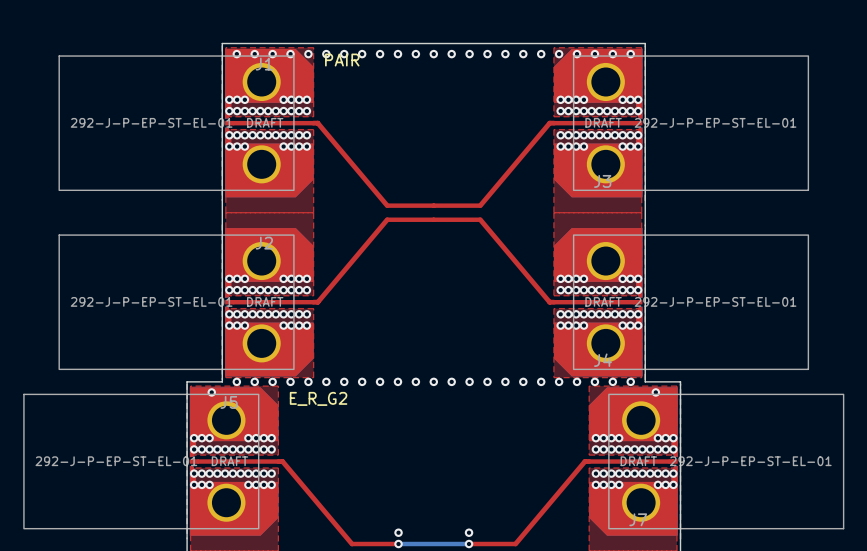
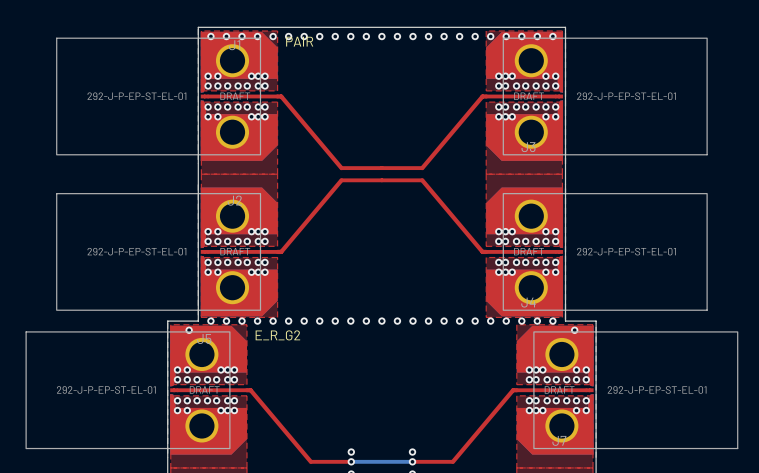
via: (229, 99) -> none
via: none -> (208, 76)
via: (237, 99) -> none
via: (306, 99) -> none
via: (560, 99) -> none
via: (630, 99) -> none
via: none -> (555, 76)
via: (638, 99) -> none
via: (229, 111) -> none
via: none -> (208, 86)
via: (237, 111) -> none
via: (252, 111) -> none
via: none -> (227, 86)
via: (260, 111) -> none
via: (275, 111) -> none
via: none -> (247, 86)
via: (283, 111) -> none
via: (306, 111) -> none
via: (560, 111) -> none
via: (583, 111) -> none
via: none -> (516, 86)
via: (591, 111) -> none
via: (607, 111) -> none
via: none -> (536, 86)
via: (614, 111) -> none
via: (630, 111) -> none
via: none -> (555, 86)
via: (638, 111) -> none
via: (229, 135) -> none
via: none -> (208, 106)
via: (237, 135) -> none
via: (252, 135) -> none
via: none -> (227, 106)
via: (260, 135) -> none
via: (275, 135) -> none
via: none -> (247, 106)
via: (283, 135) -> none
via: (306, 135) -> none
via: (560, 135) -> none
via: (583, 135) -> none
via: none -> (516, 106)
via: (591, 135) -> none
via: (607, 135) -> none
via: none -> (536, 106)
via: (614, 135) -> none
via: (630, 135) -> none
via: none -> (555, 106)
via: (638, 135) -> none
via: (229, 146) -> none
via: none -> (208, 116)
via: (237, 146) -> none
via: (306, 146) -> none
via: (560, 146) -> none
via: (630, 146) -> none
via: none -> (555, 116)
via: (638, 146) -> none
via: (229, 278) -> none
via: none -> (208, 231)
via: (237, 278) -> none
via: (306, 278) -> none
via: (560, 278) -> none
via: (630, 278) -> none
via: none -> (555, 231)
via: (638, 278) -> none
via: (229, 290) -> none
via: none -> (208, 241)
via: (237, 290) -> none
via: (252, 290) -> none
via: none -> (227, 241)
via: (260, 290) -> none
via: (275, 290) -> none
via: none -> (247, 241)
via: (283, 290) -> none
via: (306, 290) -> none
via: (560, 290) -> none
via: (583, 290) -> none
via: none -> (516, 241)
via: (591, 290) -> none
via: (607, 290) -> none
via: none -> (536, 241)
via: (614, 290) -> none
via: (630, 290) -> none
via: none -> (555, 241)
via: (638, 290) -> none
via: (229, 314) -> none
via: none -> (208, 262)
via: (237, 314) -> none
via: (252, 314) -> none
via: none -> (227, 262)
via: (260, 314) -> none
via: (275, 314) -> none
via: none -> (247, 262)
via: (283, 314) -> none
via: (306, 314) -> none
via: (560, 314) -> none
via: (583, 314) -> none
via: none -> (516, 262)
via: (591, 314) -> none
via: (607, 314) -> none
via: none -> (536, 262)
via: (614, 314) -> none
via: (630, 314) -> none
via: none -> (555, 262)
via: (638, 314) -> none
via: (229, 325) -> none
via: none -> (208, 272)
via: (237, 325) -> none
via: (306, 325) -> none
via: (560, 325) -> none
via: (630, 325) -> none
via: none -> (555, 272)
via: (638, 325) -> none
via: (194, 438) -> none
via: none -> (177, 369)
via: (201, 438) -> none
via: (271, 438) -> none
via: (595, 438) -> none
via: (665, 438) -> none
via: none -> (586, 369)
via: (673, 438) -> none
via: (194, 449) -> none
via: none -> (177, 379)
via: (201, 449) -> none
via: (217, 449) -> none
via: none -> (197, 379)
via: (225, 449) -> none
via: (240, 449) -> none
via: none -> (216, 379)
via: (248, 449) -> none
via: (271, 449) -> none
via: (595, 449) -> none
via: (619, 449) -> none
via: none -> (547, 379)
via: (626, 449) -> none
via: (642, 449) -> none
via: none -> (566, 379)
via: (650, 449) -> none
via: (665, 449) -> none
via: none -> (586, 379)
via: (673, 449) -> none
via: (194, 473) -> none
via: none -> (177, 400)
via: (201, 473) -> none
via: (217, 473) -> none
via: none -> (197, 400)
via: (225, 473) -> none
via: (240, 473) -> none
via: none -> (216, 400)
via: (248, 473) -> none
via: (271, 473) -> none
via: (595, 473) -> none
via: (619, 473) -> none
via: none -> (547, 400)
via: (626, 473) -> none
via: (642, 473) -> none
via: none -> (566, 400)
via: (650, 473) -> none
via: (665, 473) -> none
via: none -> (586, 400)
via: (673, 473) -> none
via: (194, 484) -> none
via: none -> (177, 410)
via: (201, 484) -> none
via: (271, 484) -> none
via: (595, 484) -> none
via: (665, 484) -> none
via: none -> (586, 410)
via: (673, 484) -> none

